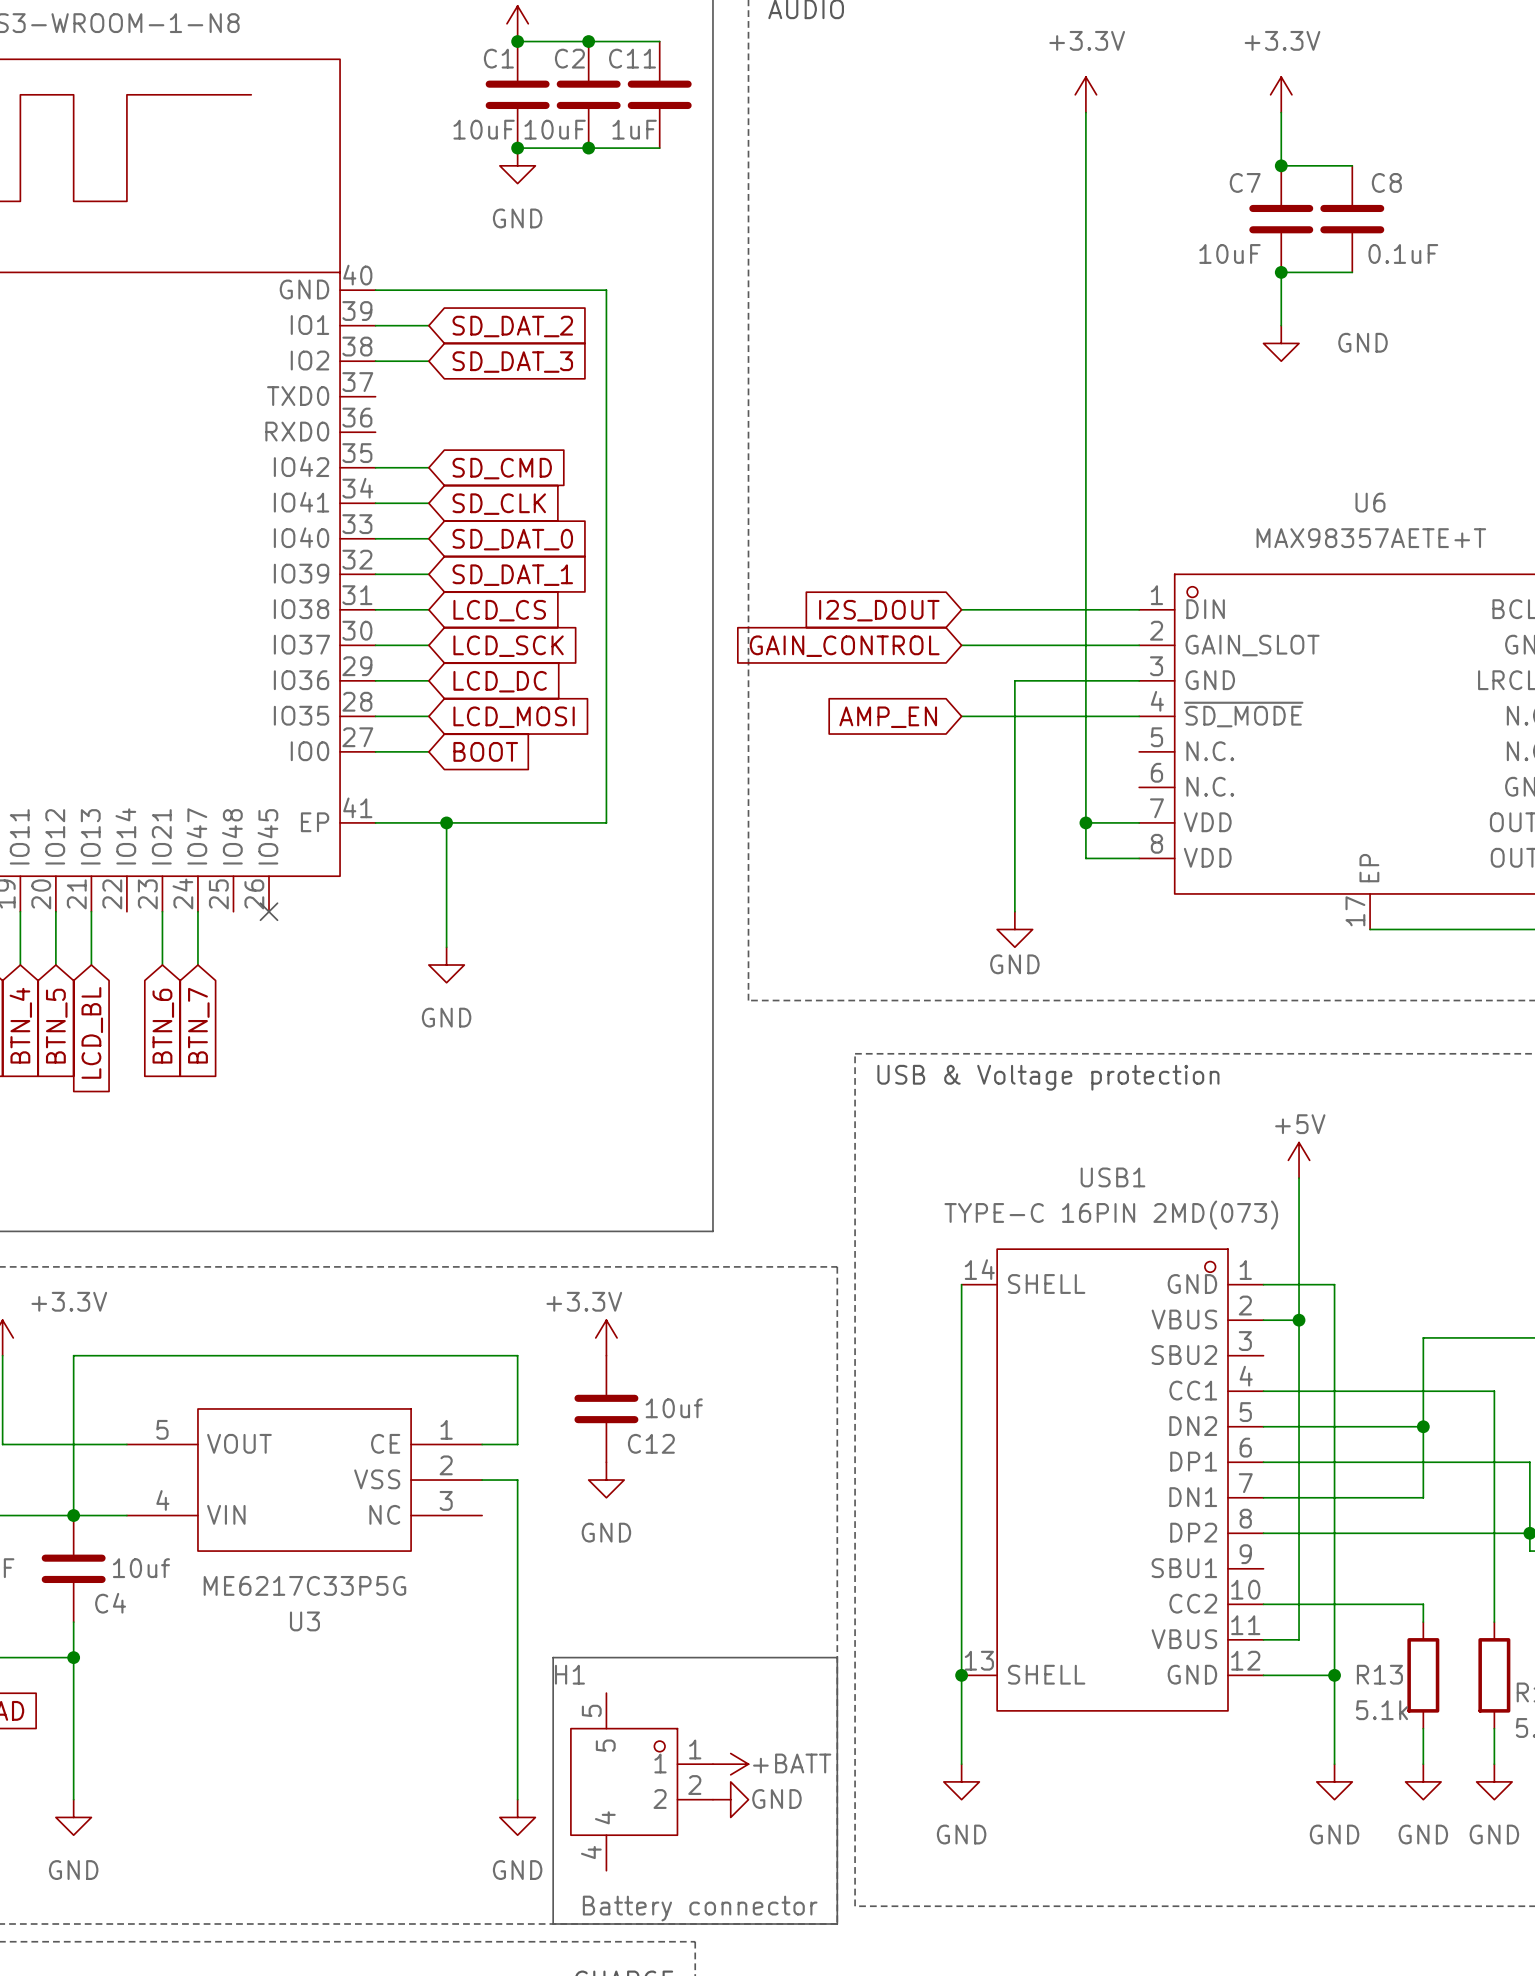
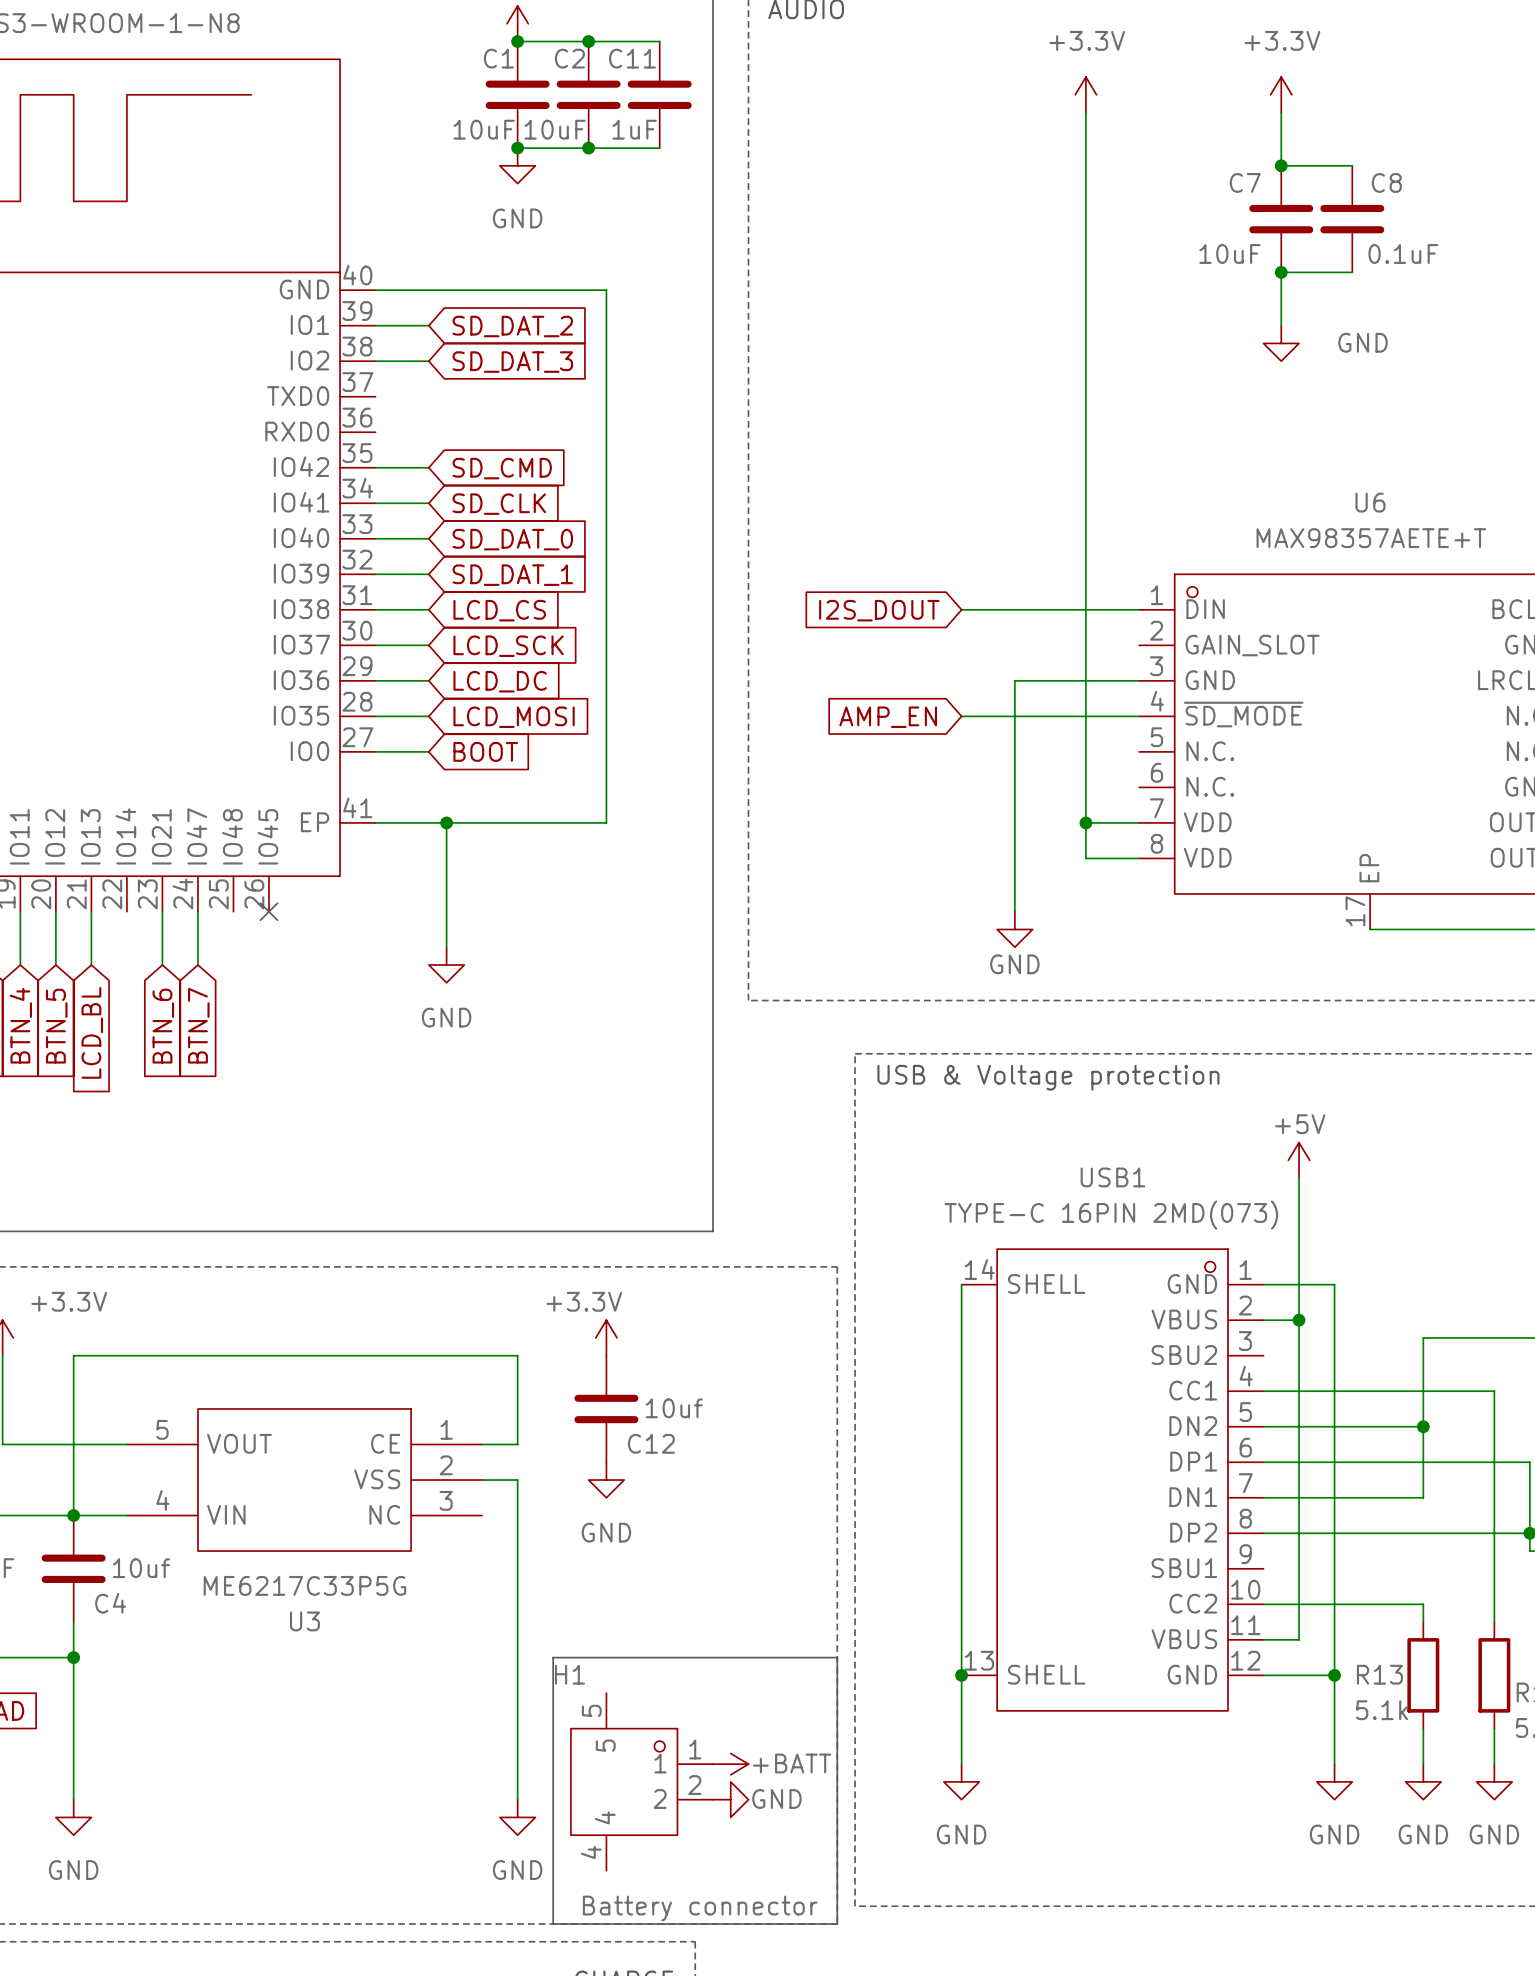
wire: (961, 645) (1139, 645) -> none
global label: GAIN_CONTROL (844, 646) -> none

